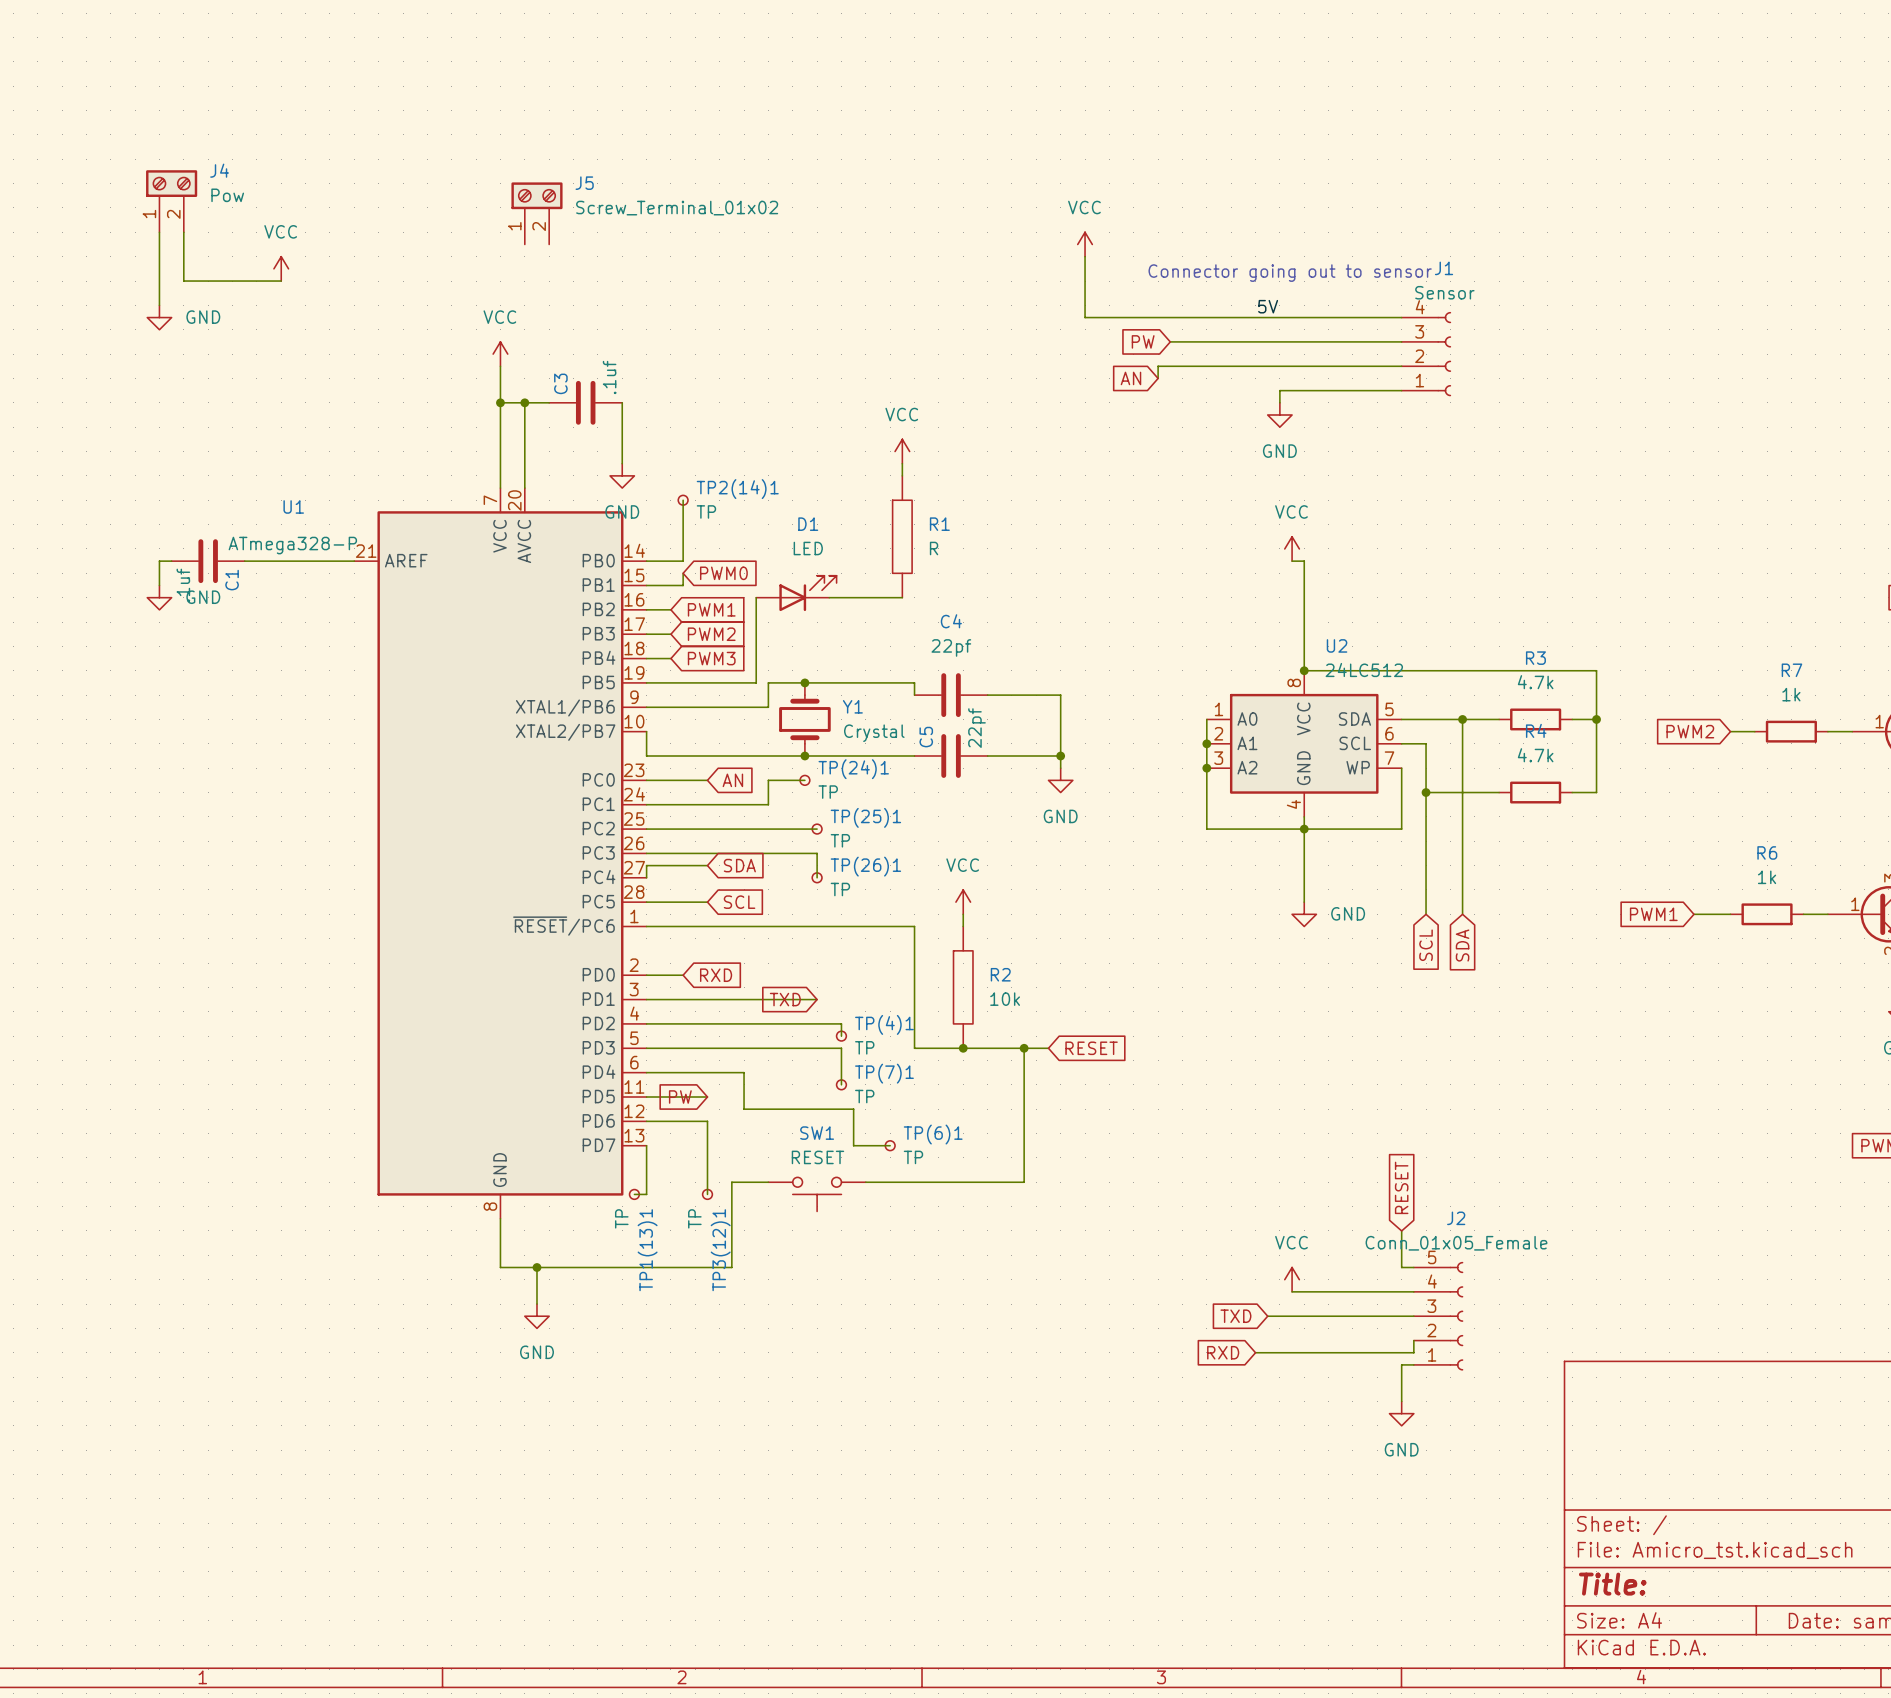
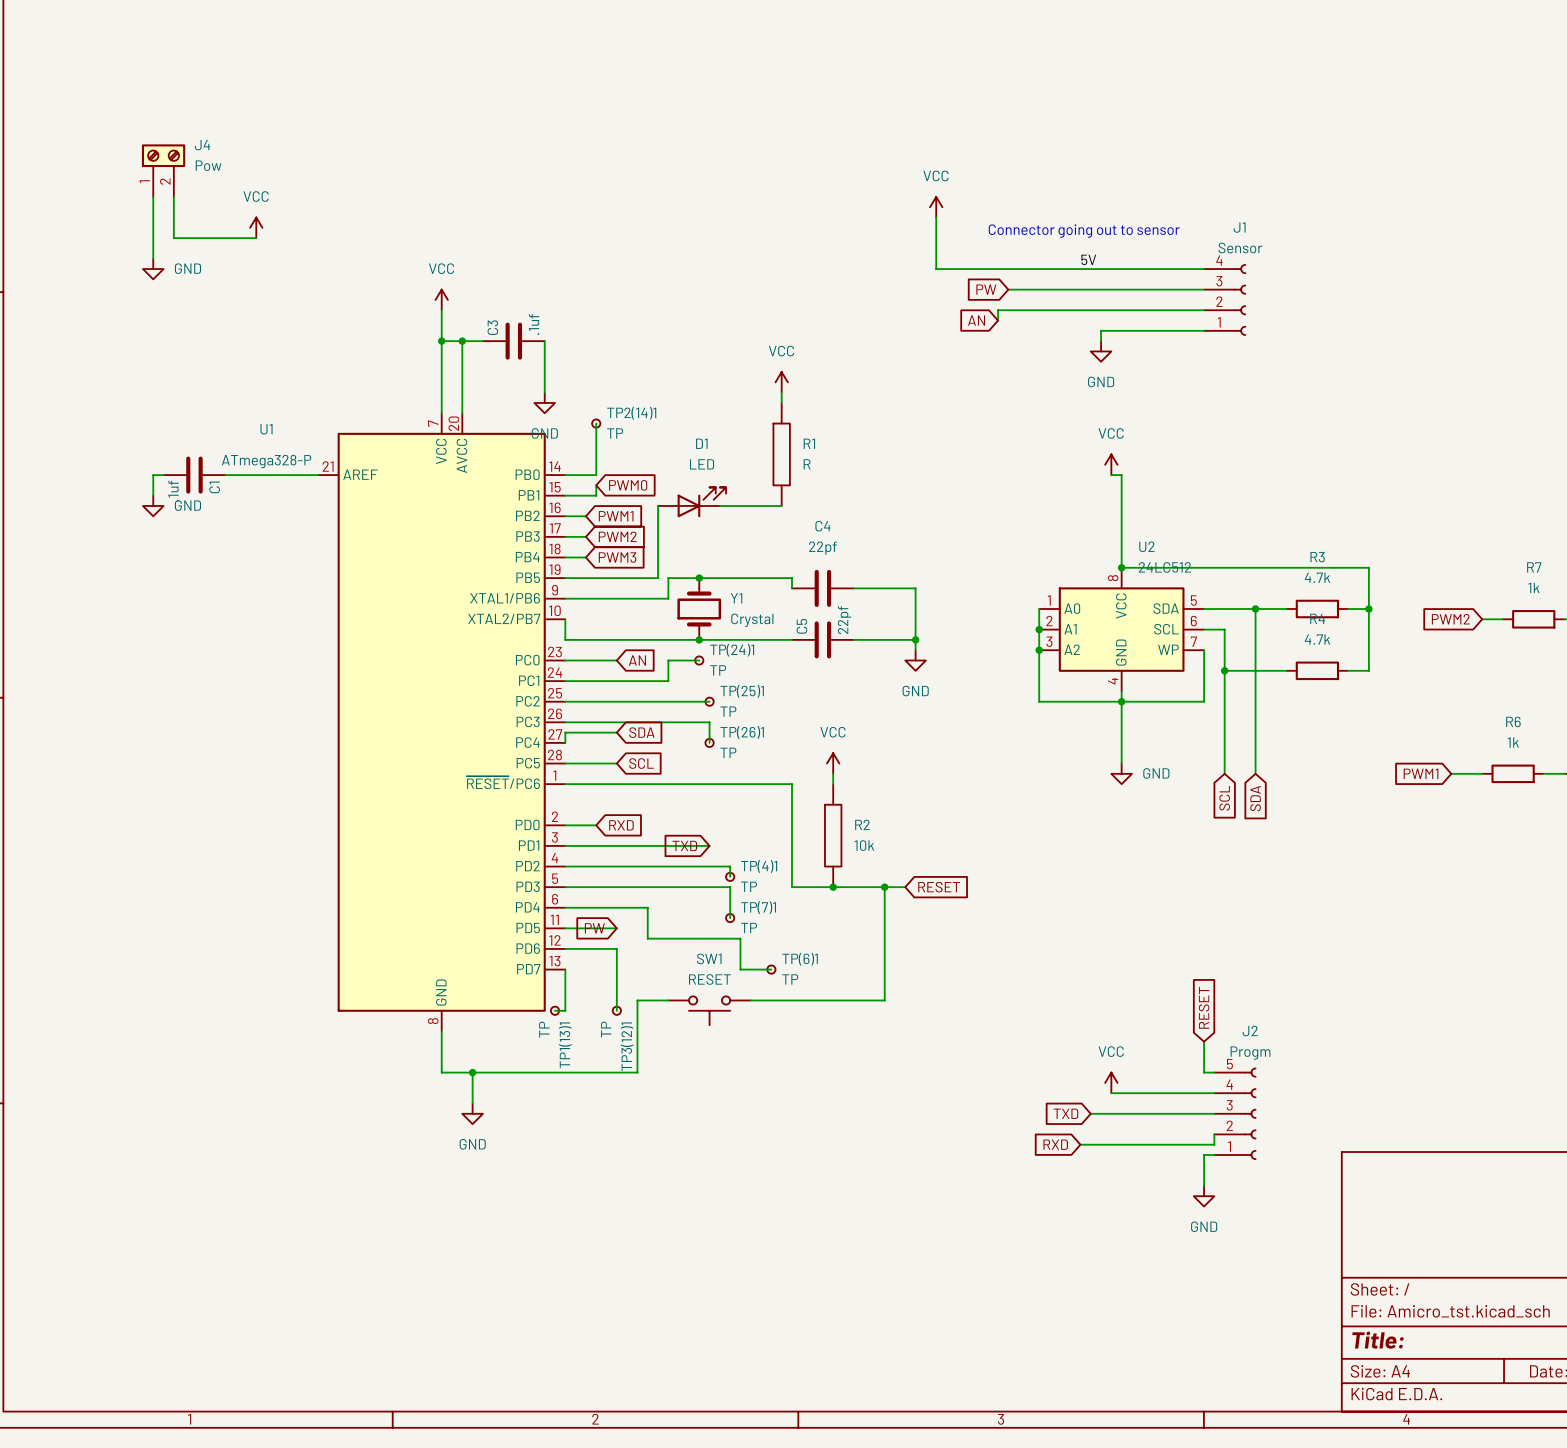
J5: Screw_Terminal_01x02 (536, 213) -> none
J2 value: Conn_01x05_Female (1456, 1243) -> Progm (1250, 1053)

